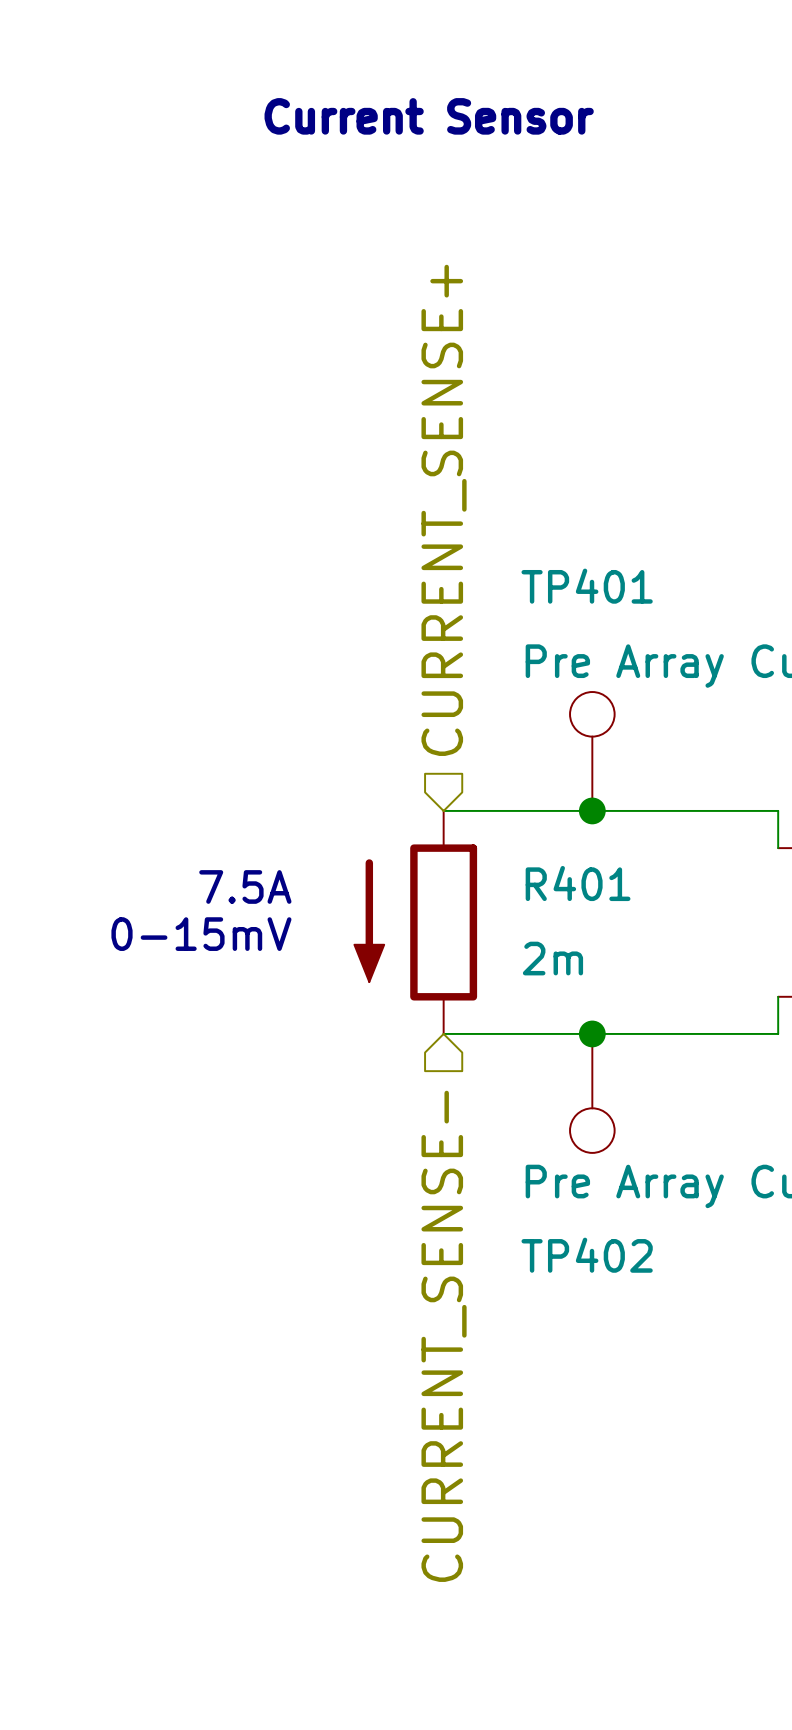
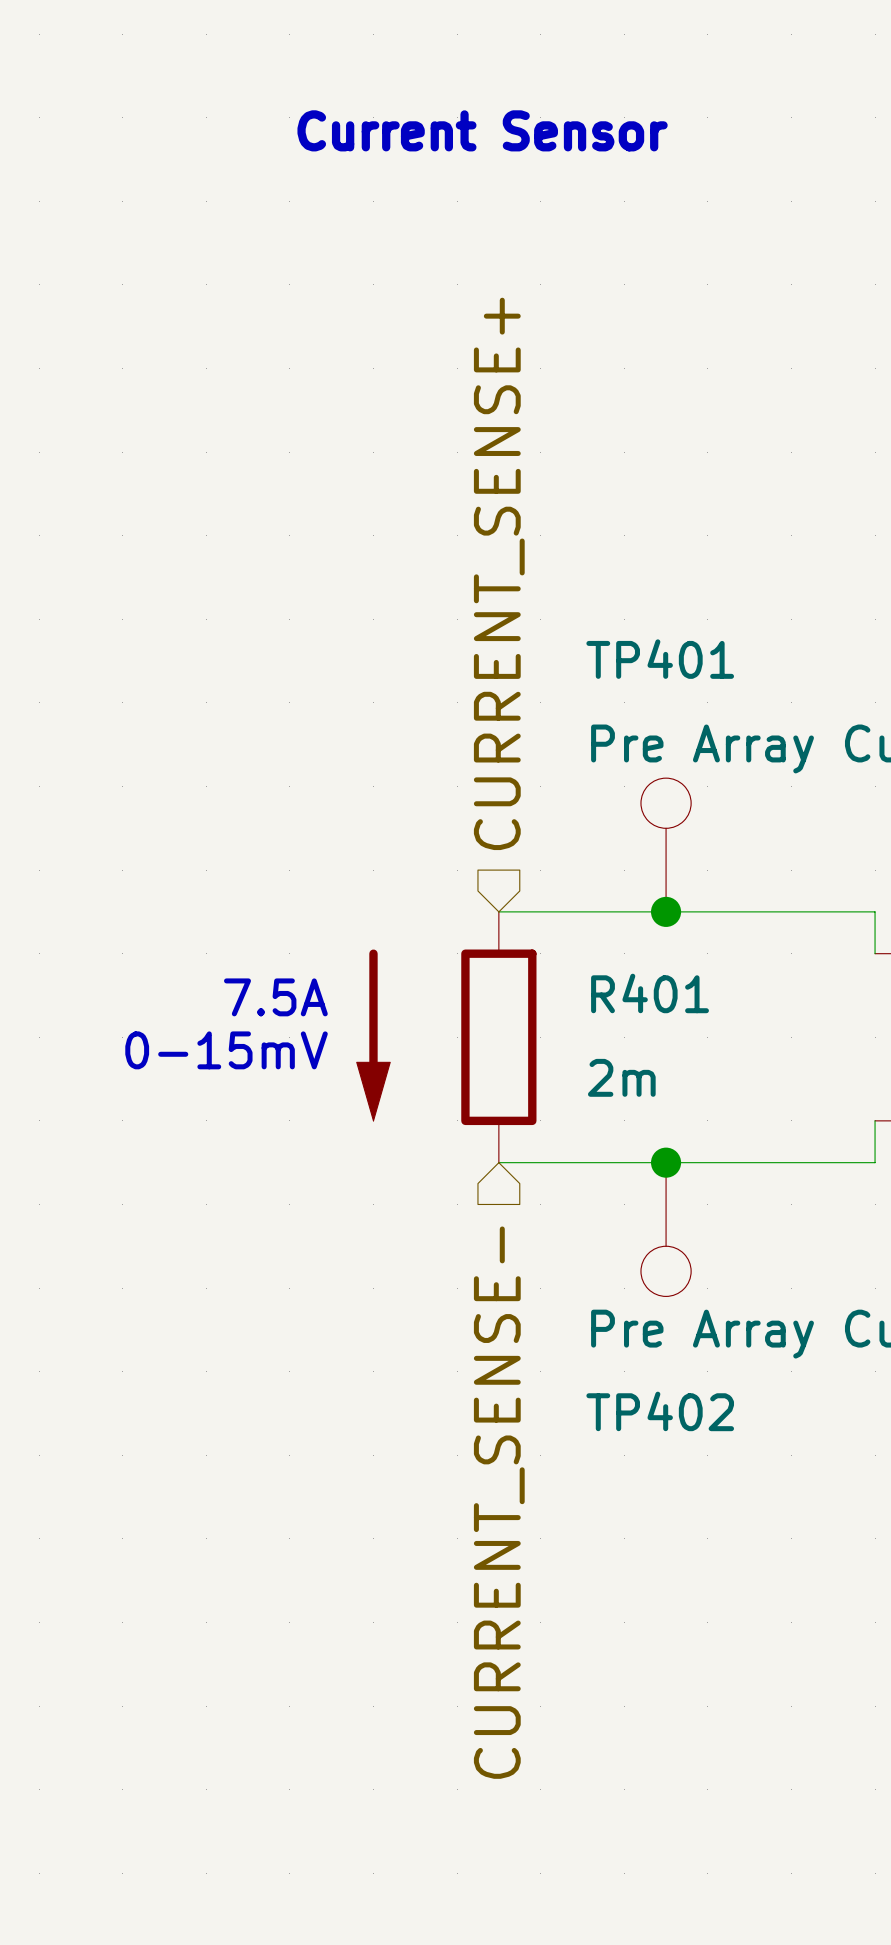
power symbol: none -> (373, 1035)
power symbol: (369, 920) -> none

